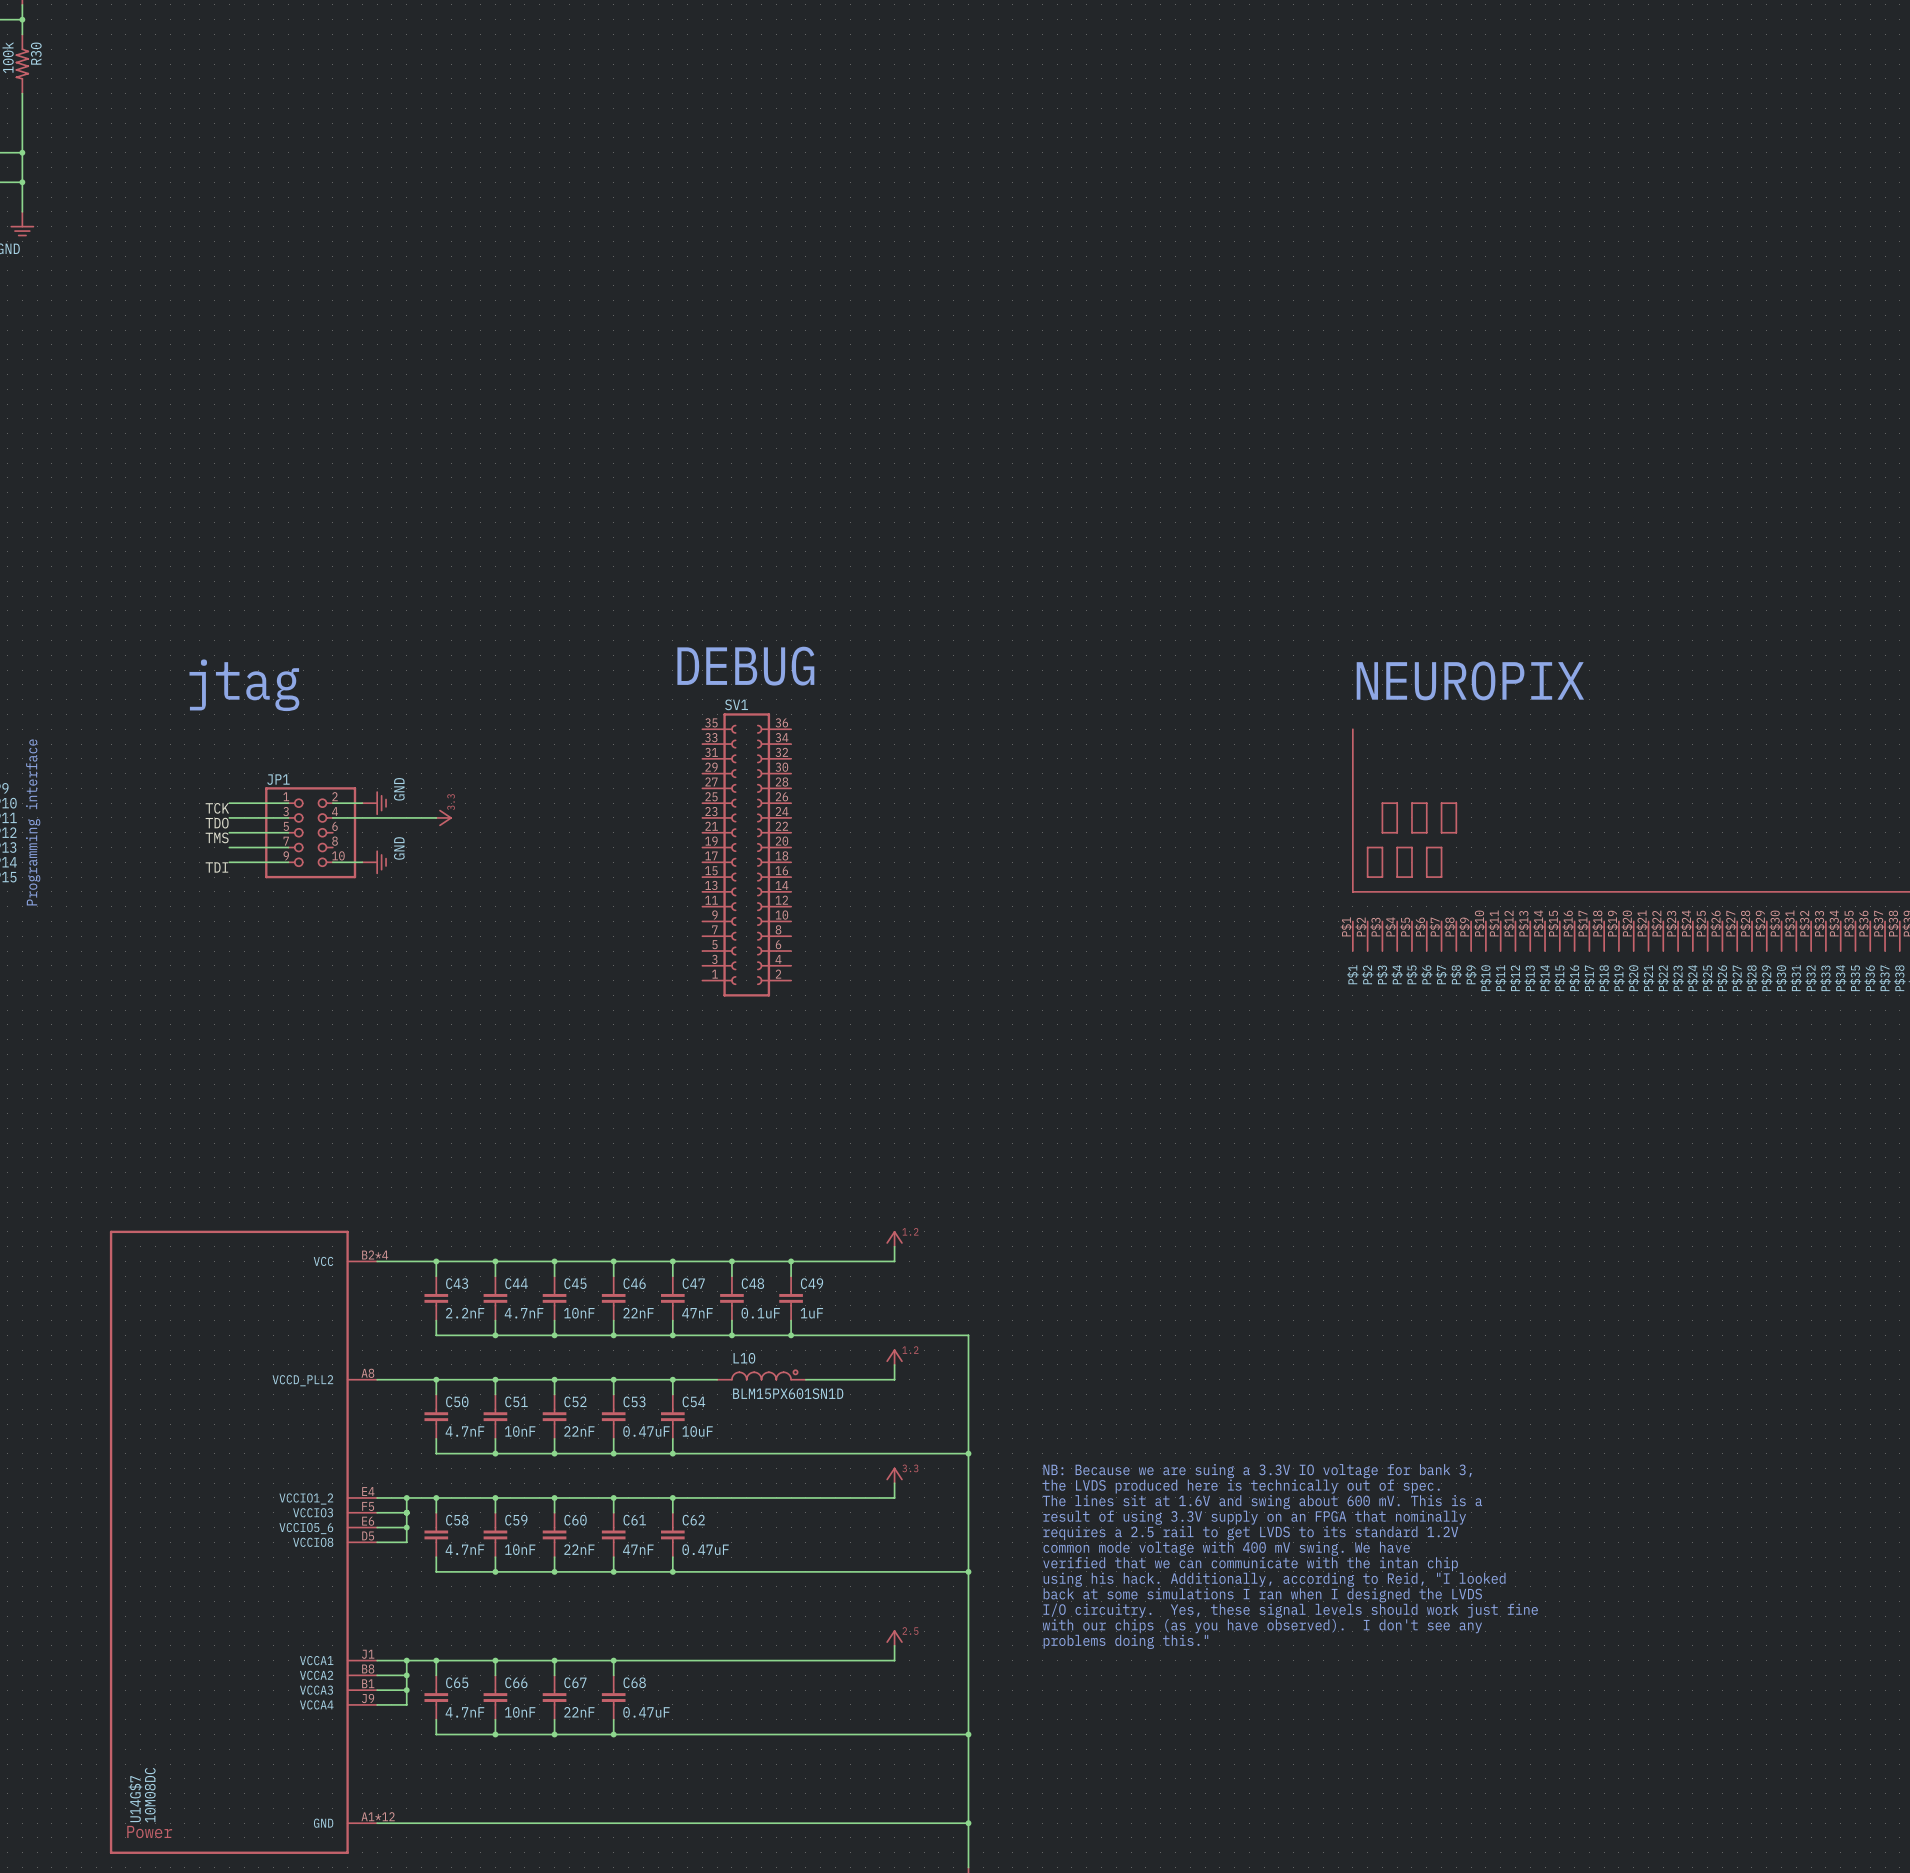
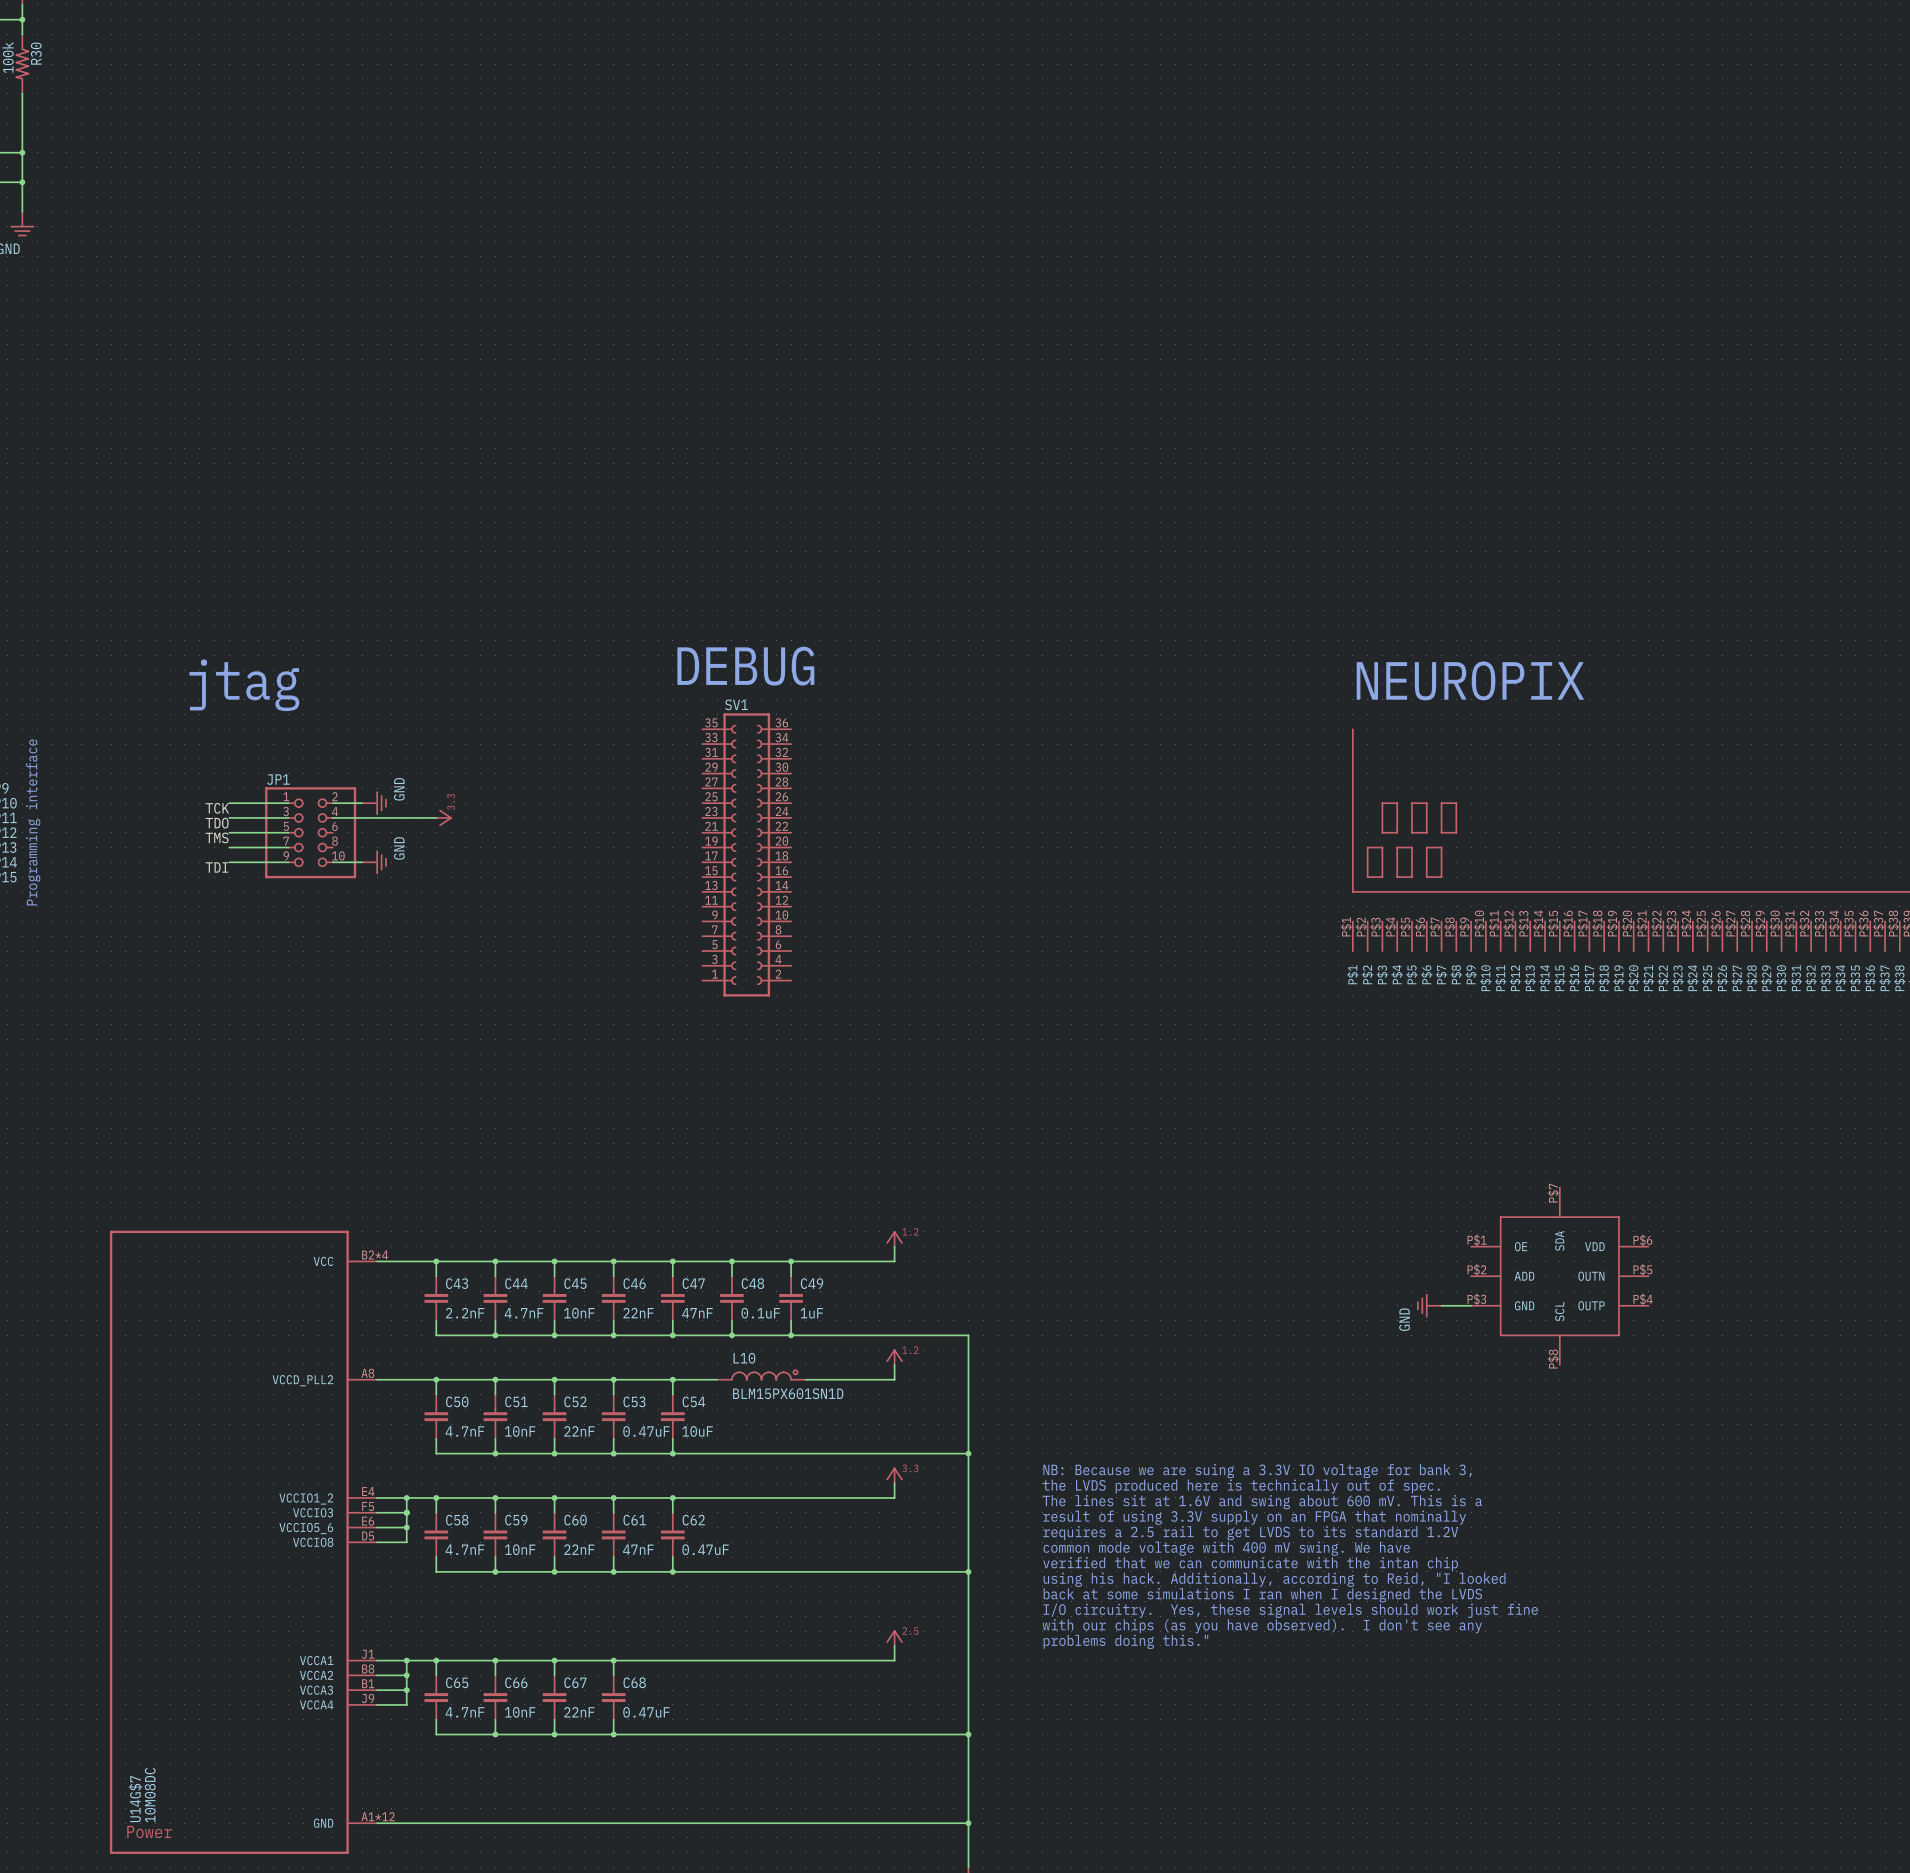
part: none -> (1559, 1276)
power symbol: none -> GND (1429, 1305)
wire: none -> (1441, 1305) (1471, 1305)

